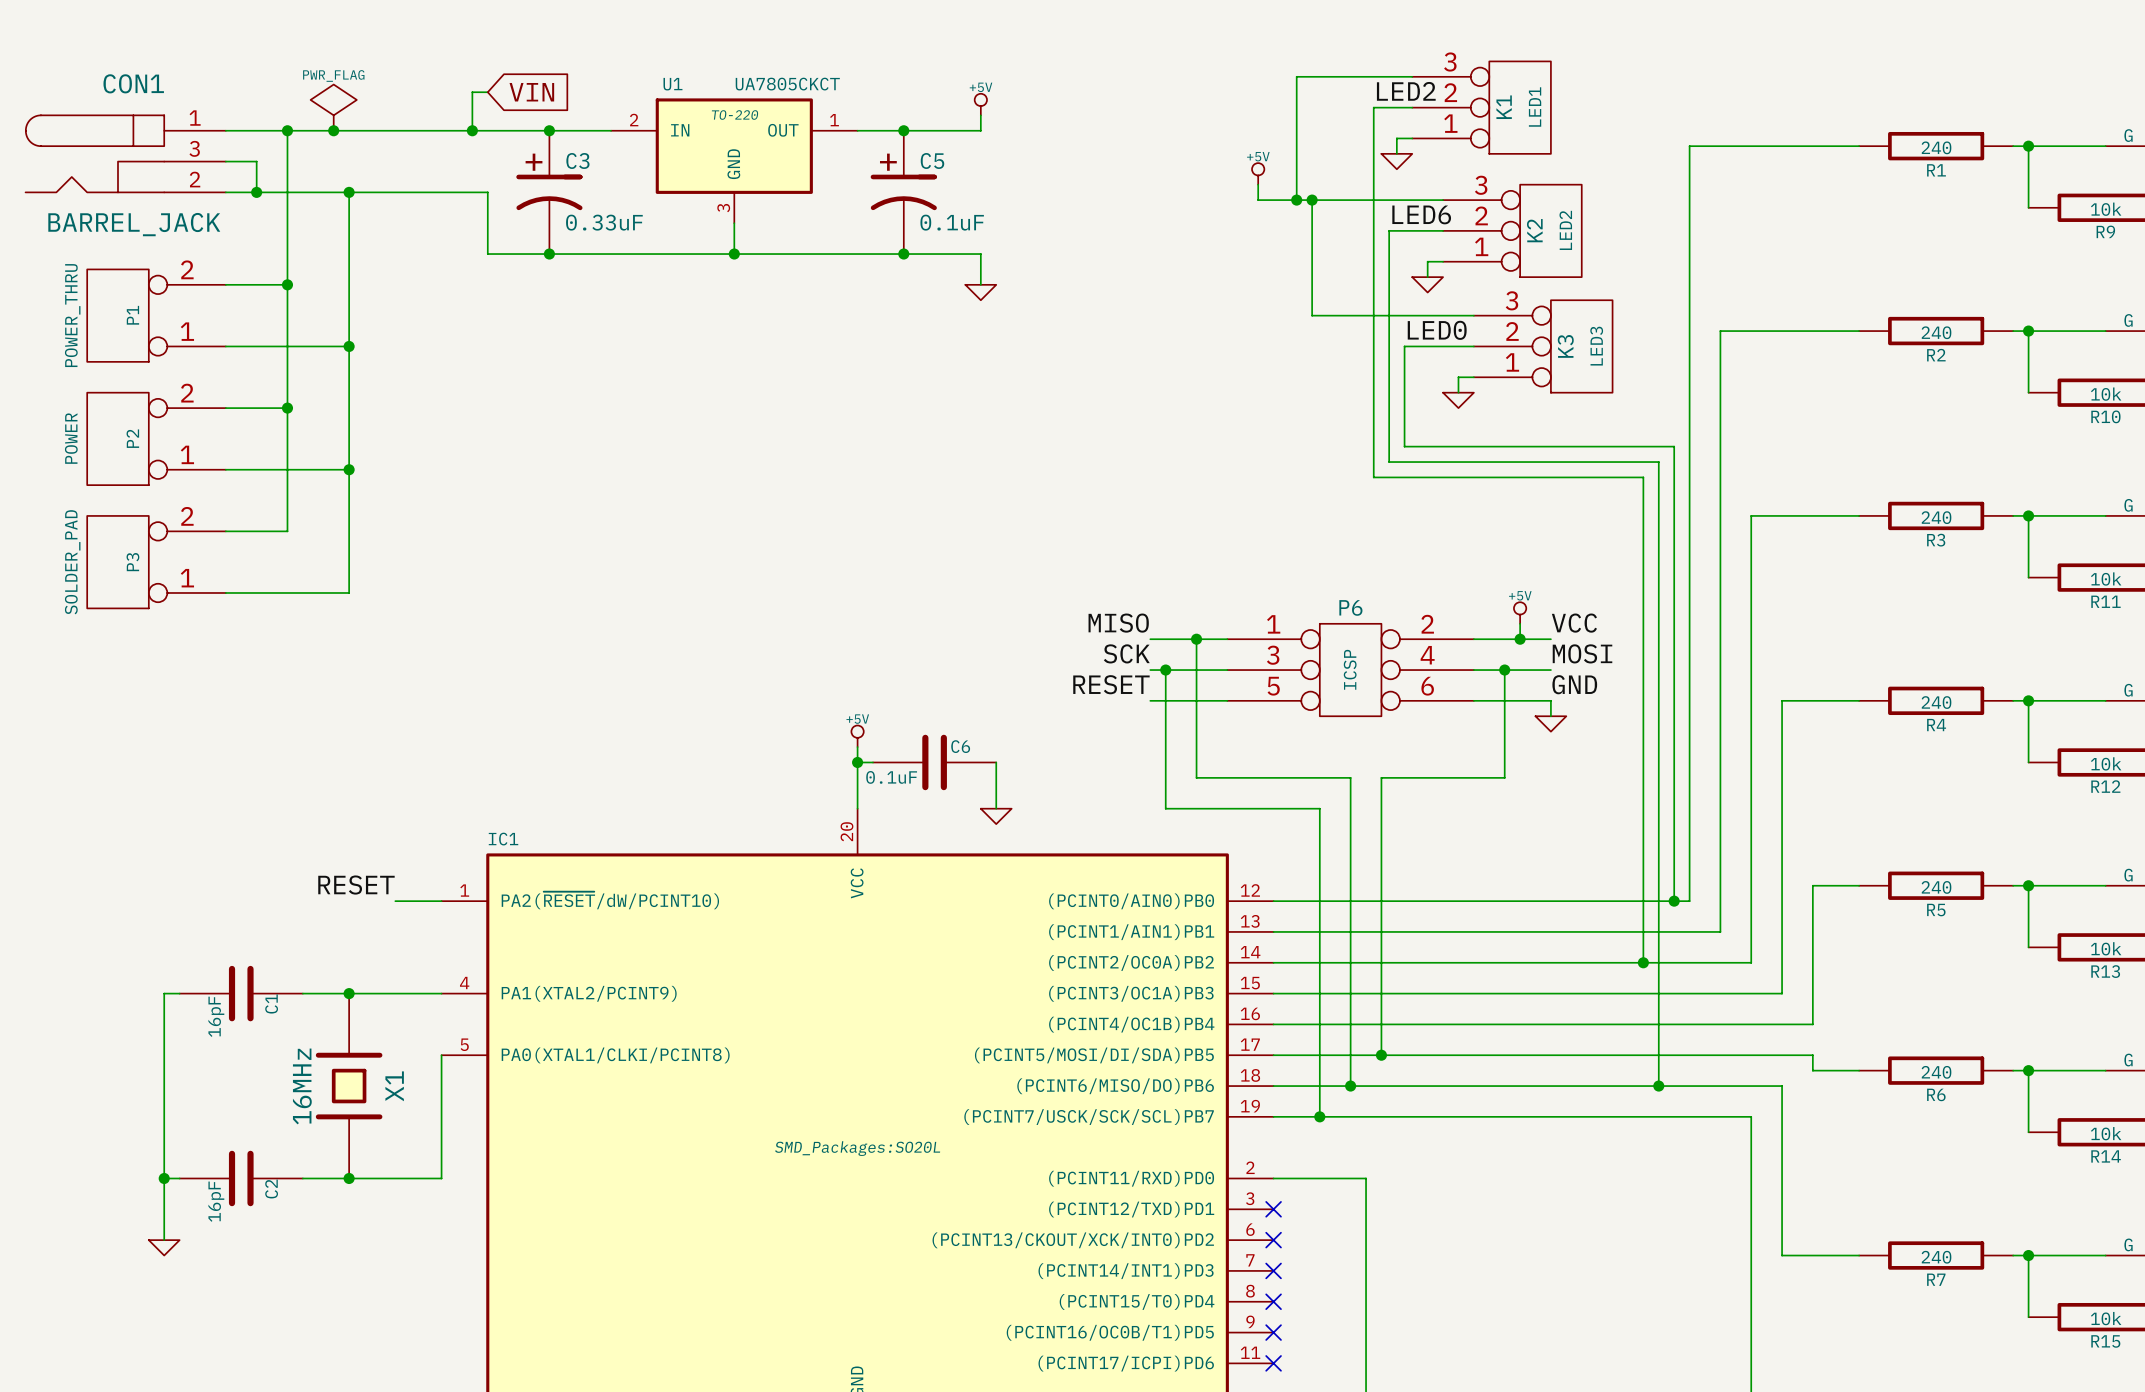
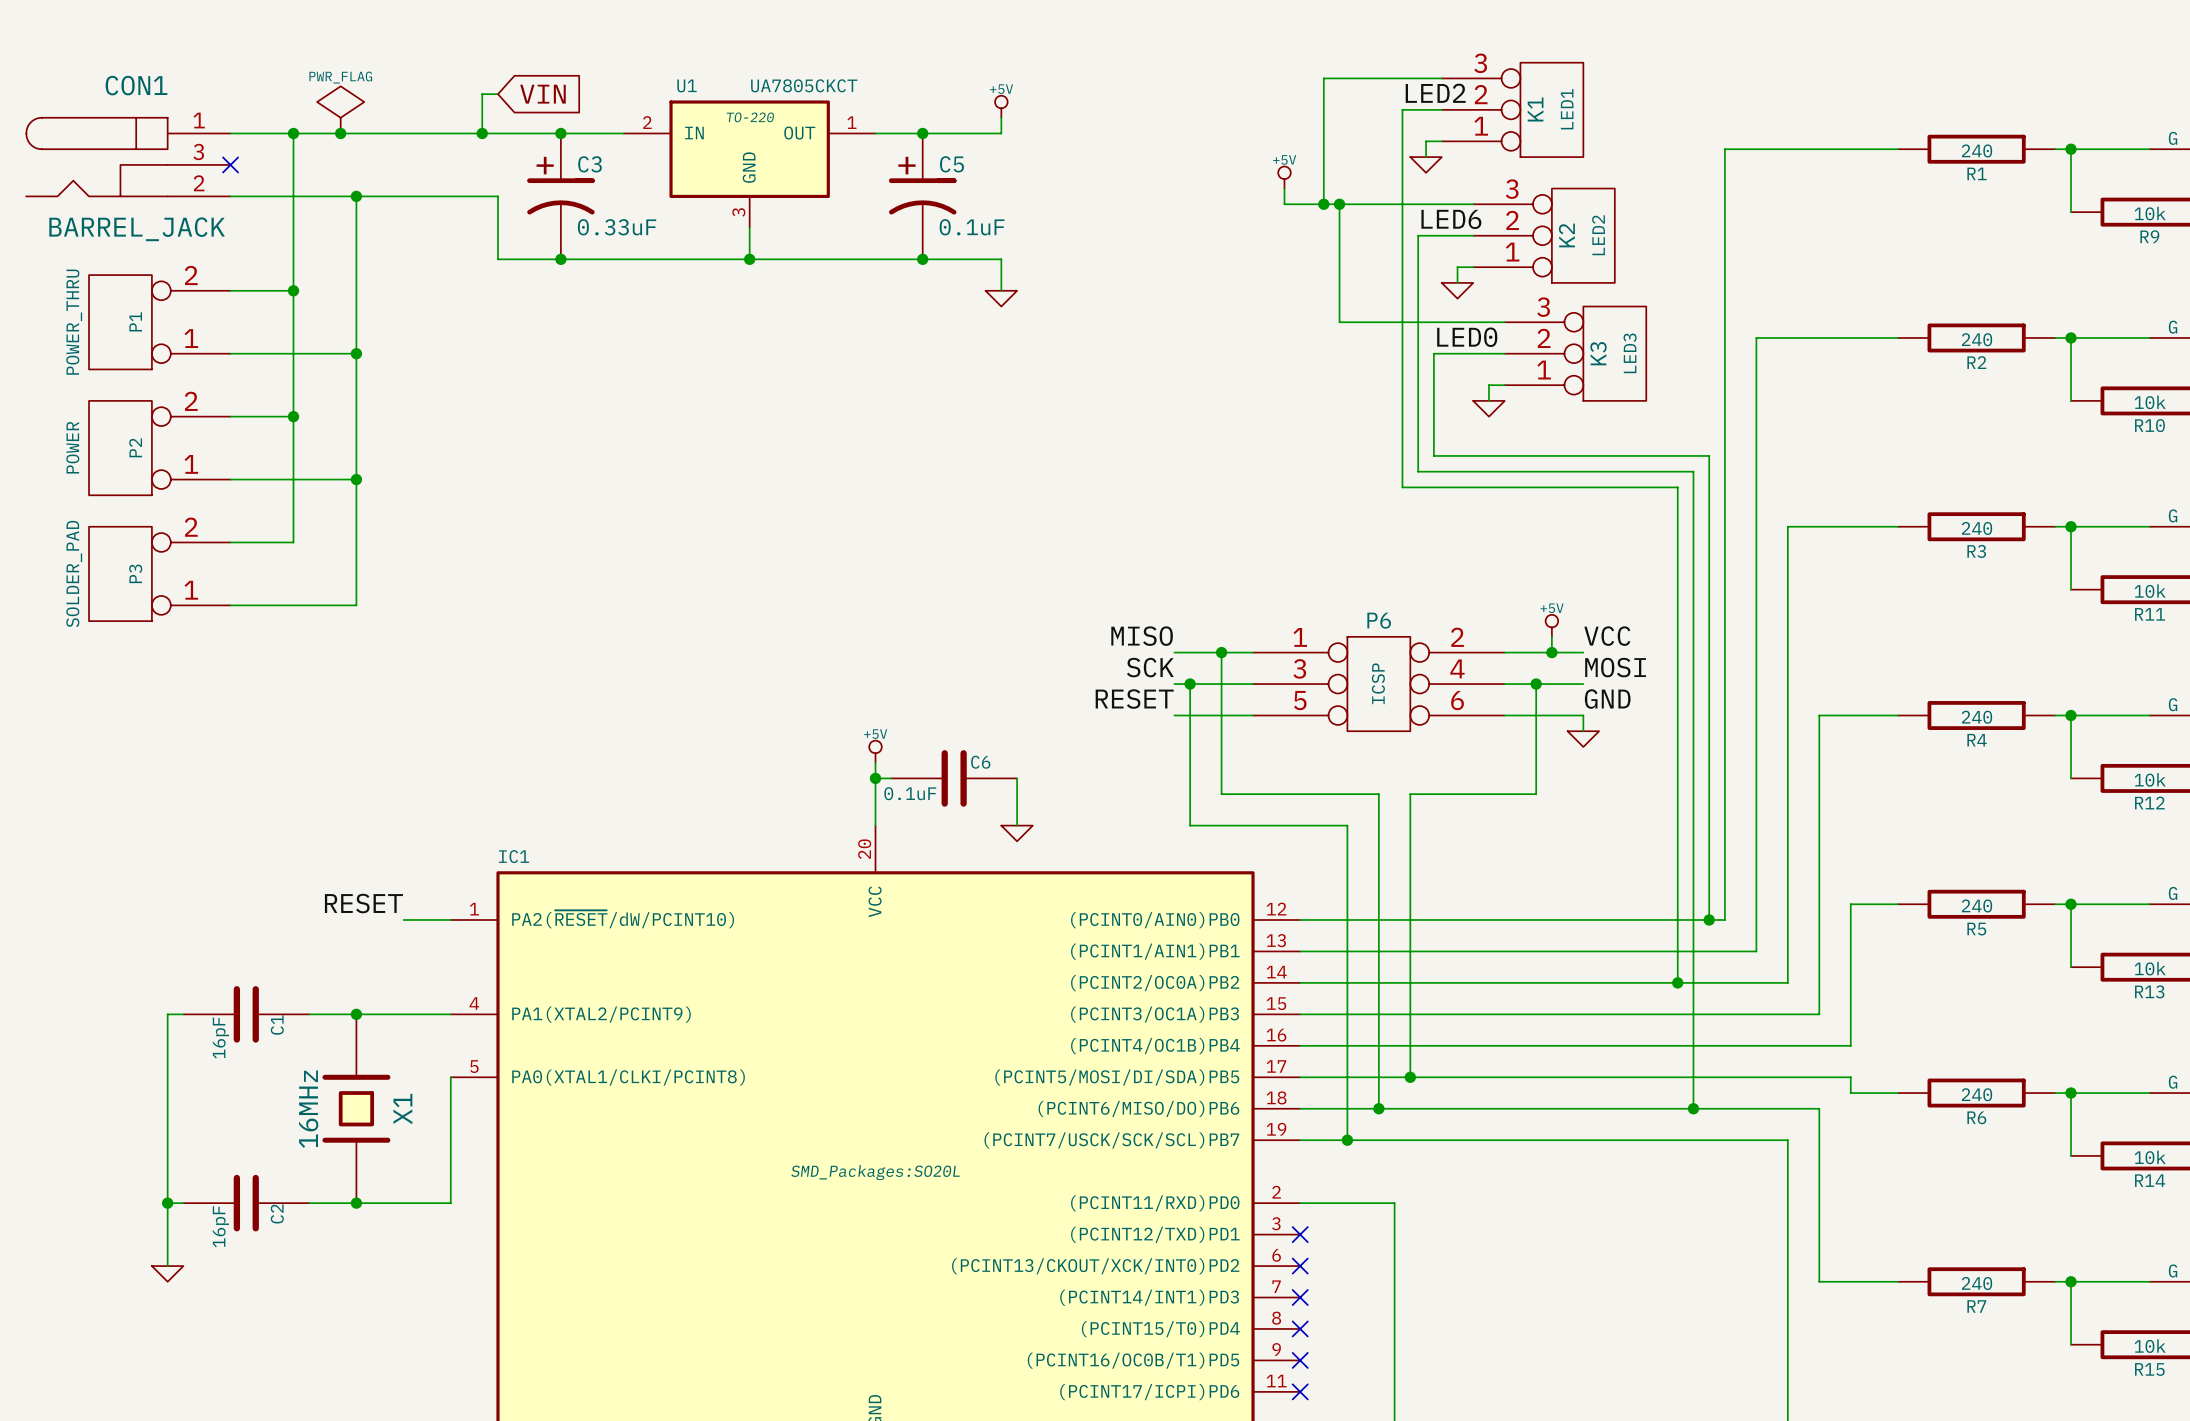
wire: (225, 161) (256, 161) (256, 192) -> none
no-connect mark: none -> (230, 164)
junction: (256, 192) -> none

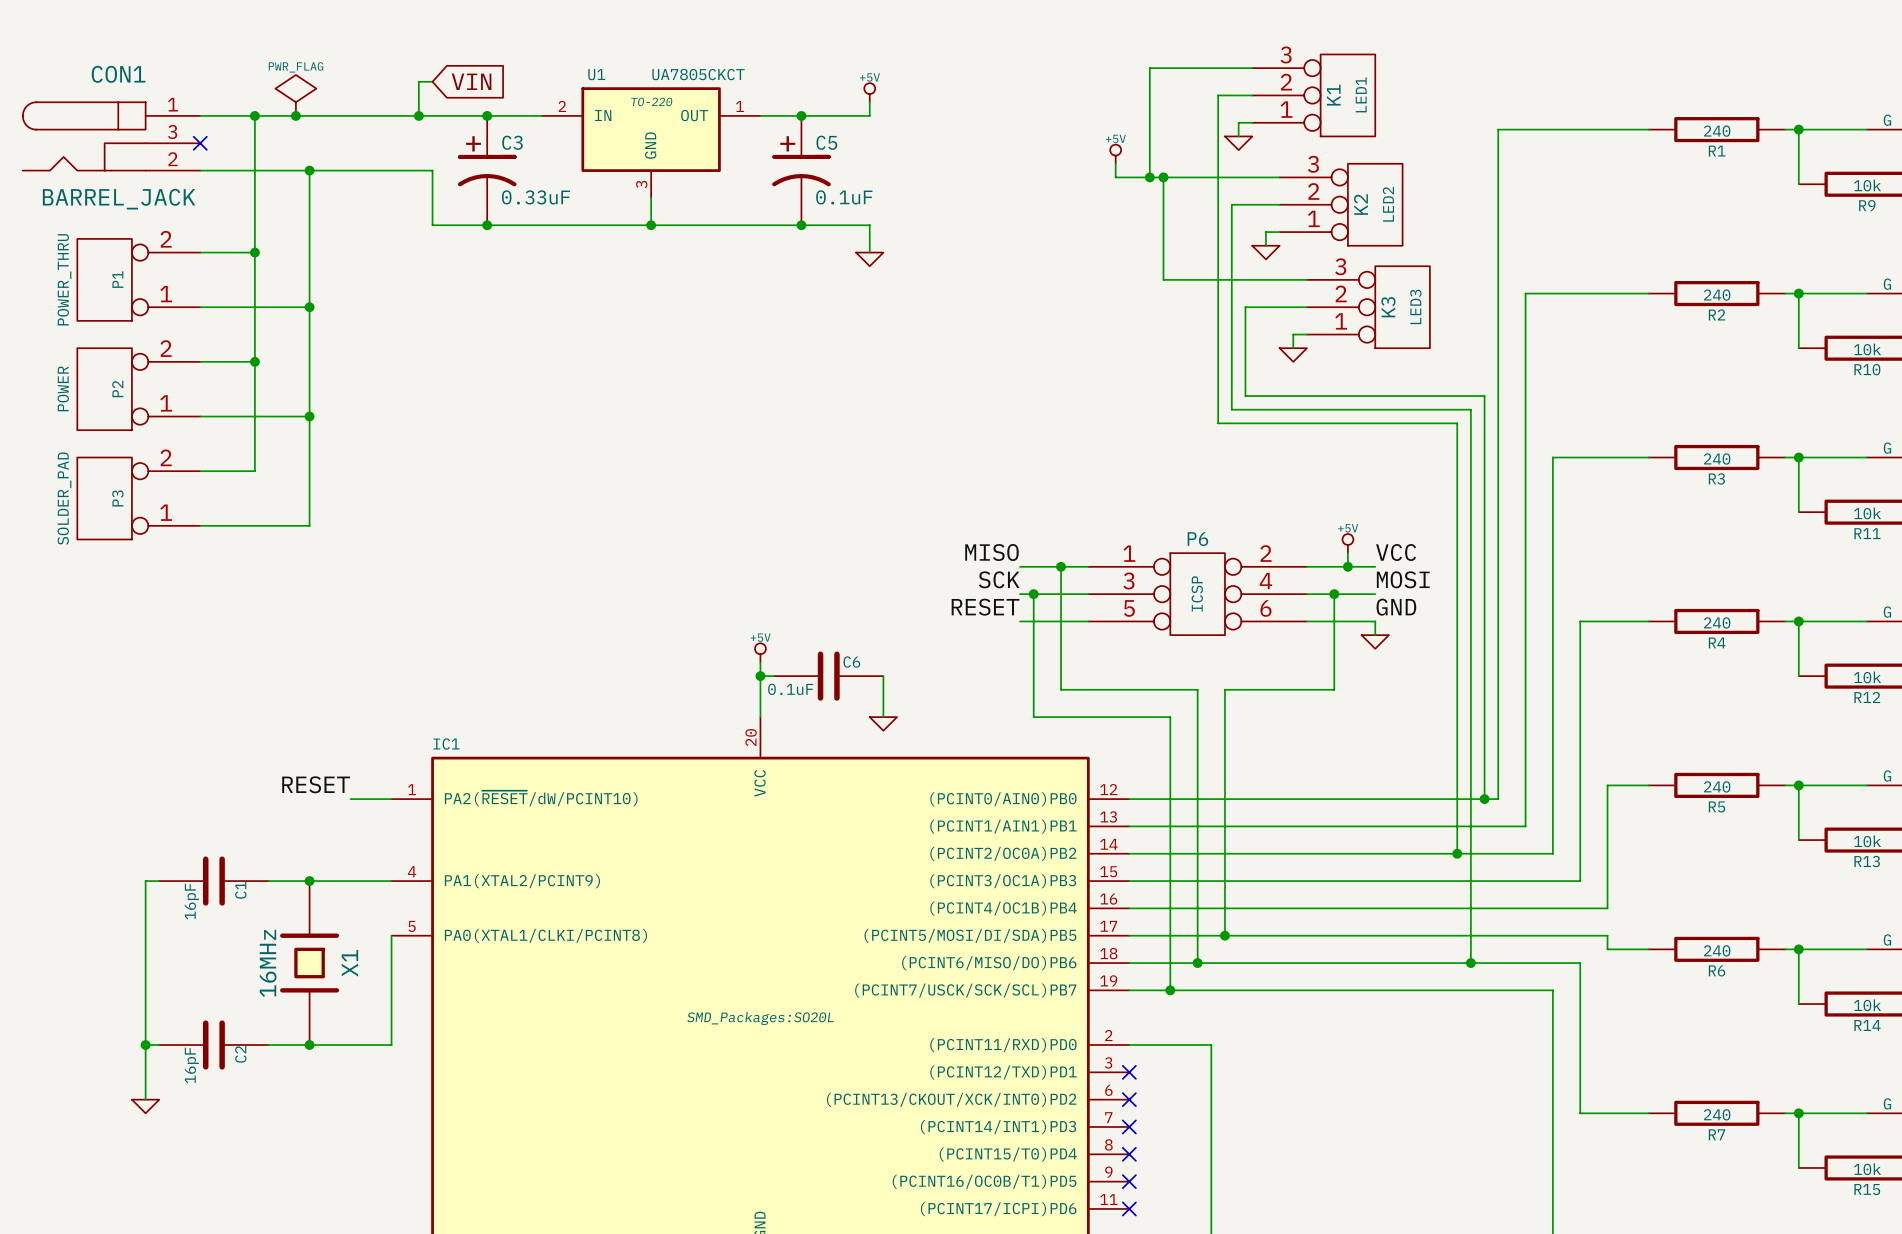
label: LED2 (1435, 93) -> none
label: LED6 (1451, 219) -> none
label: LED0 (1467, 337) -> none

